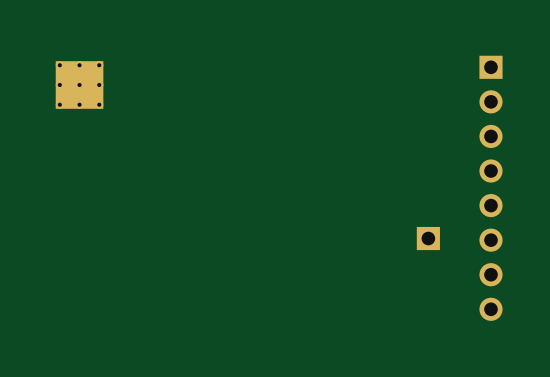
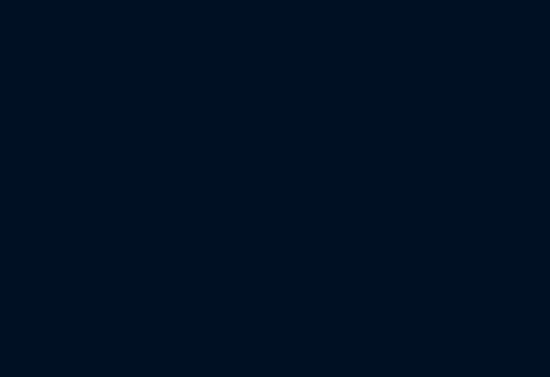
part: (79, 84) -> none
part: (490, 188) -> none
part: (428, 238) -> none

